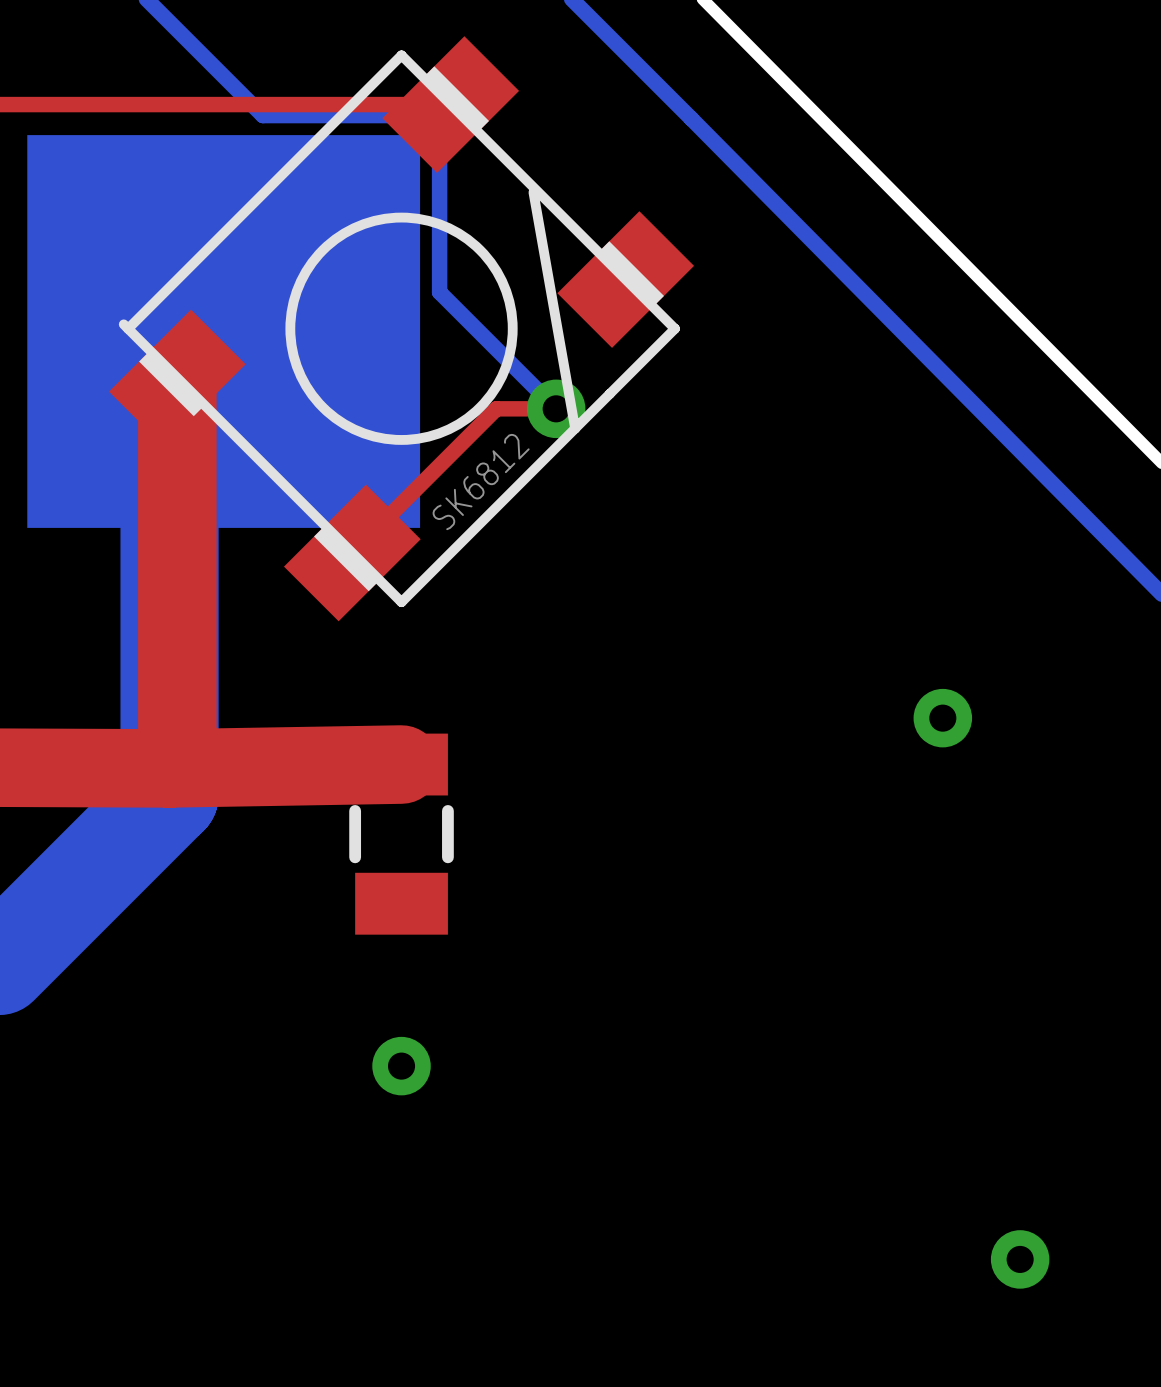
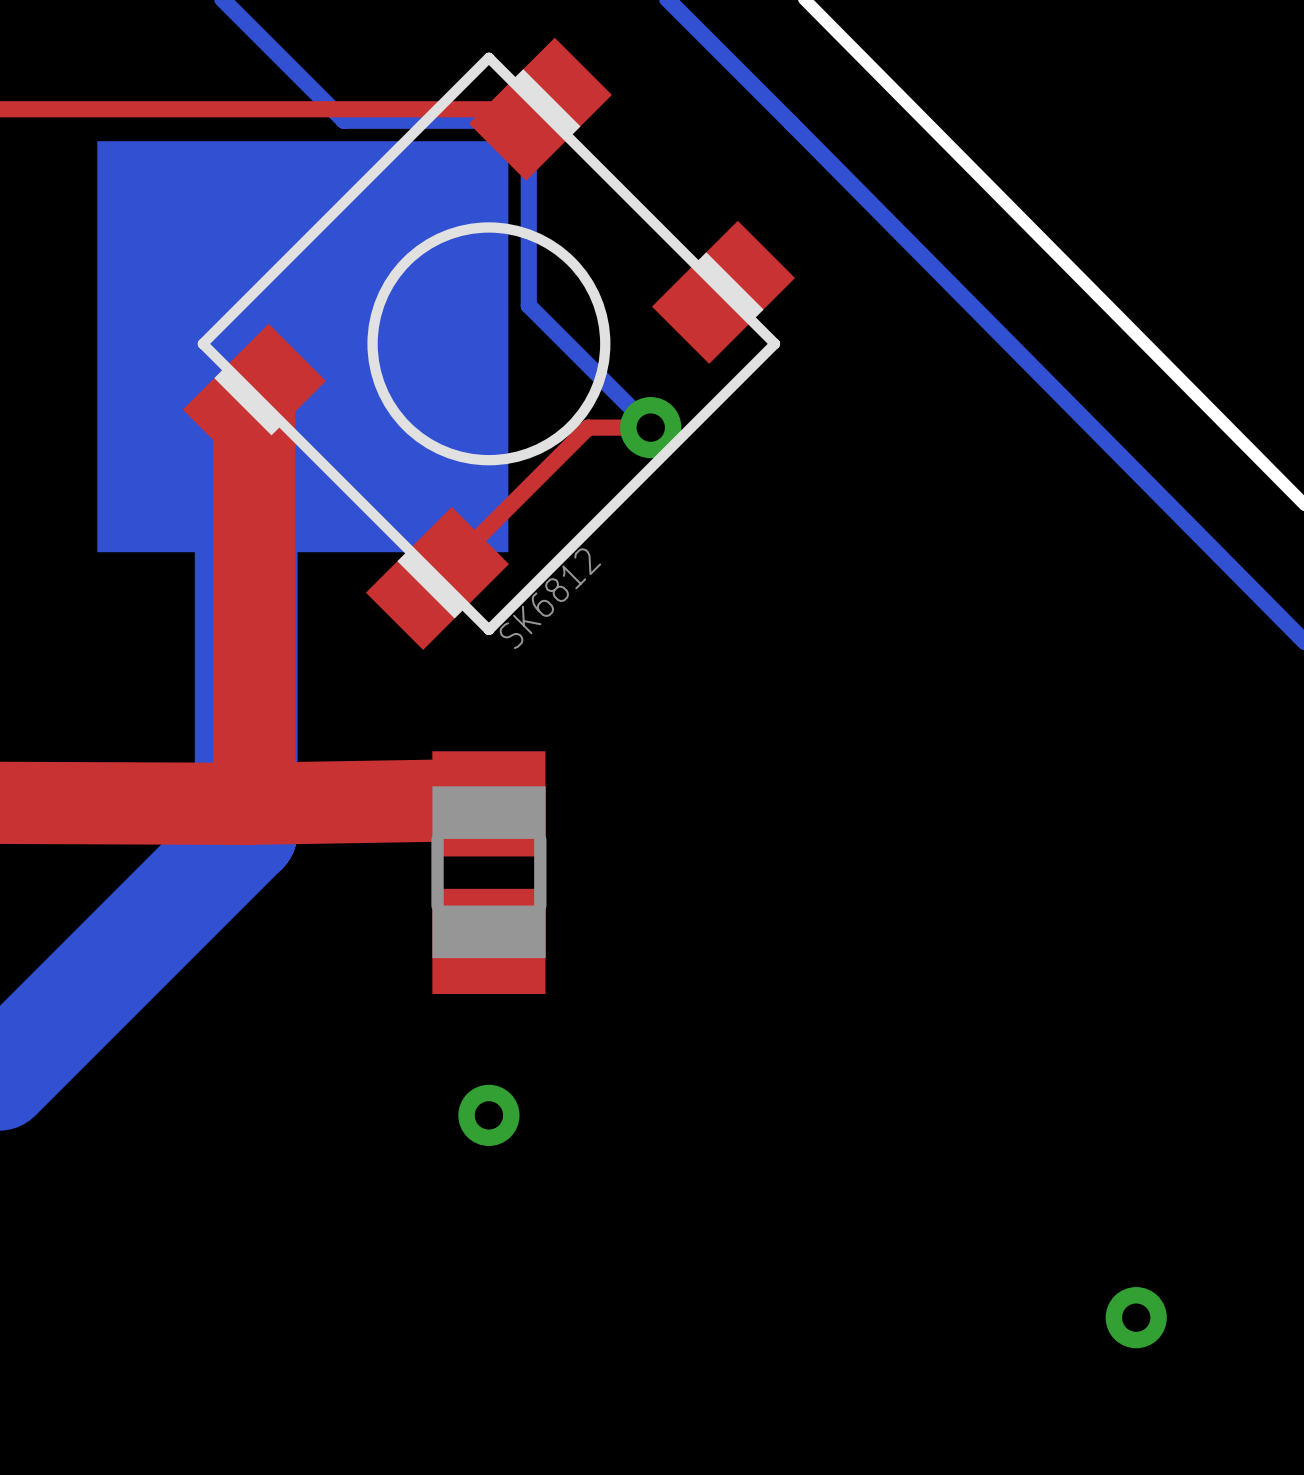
part footprint: [109, 36, 695, 622] -> [182, 37, 796, 650]
via: (942, 718) -> none
part footprint: [349, 733, 454, 935] -> [431, 751, 547, 995]

